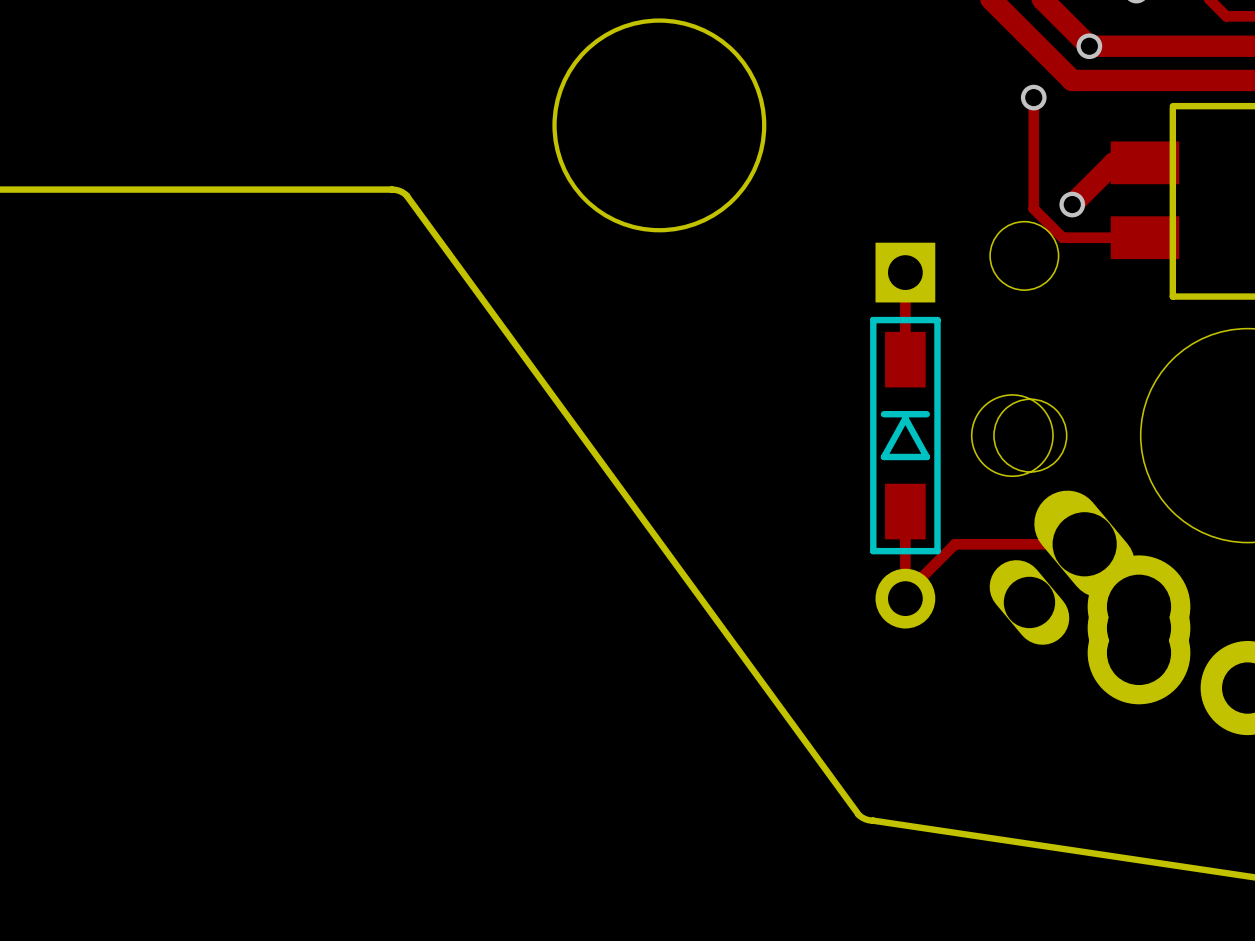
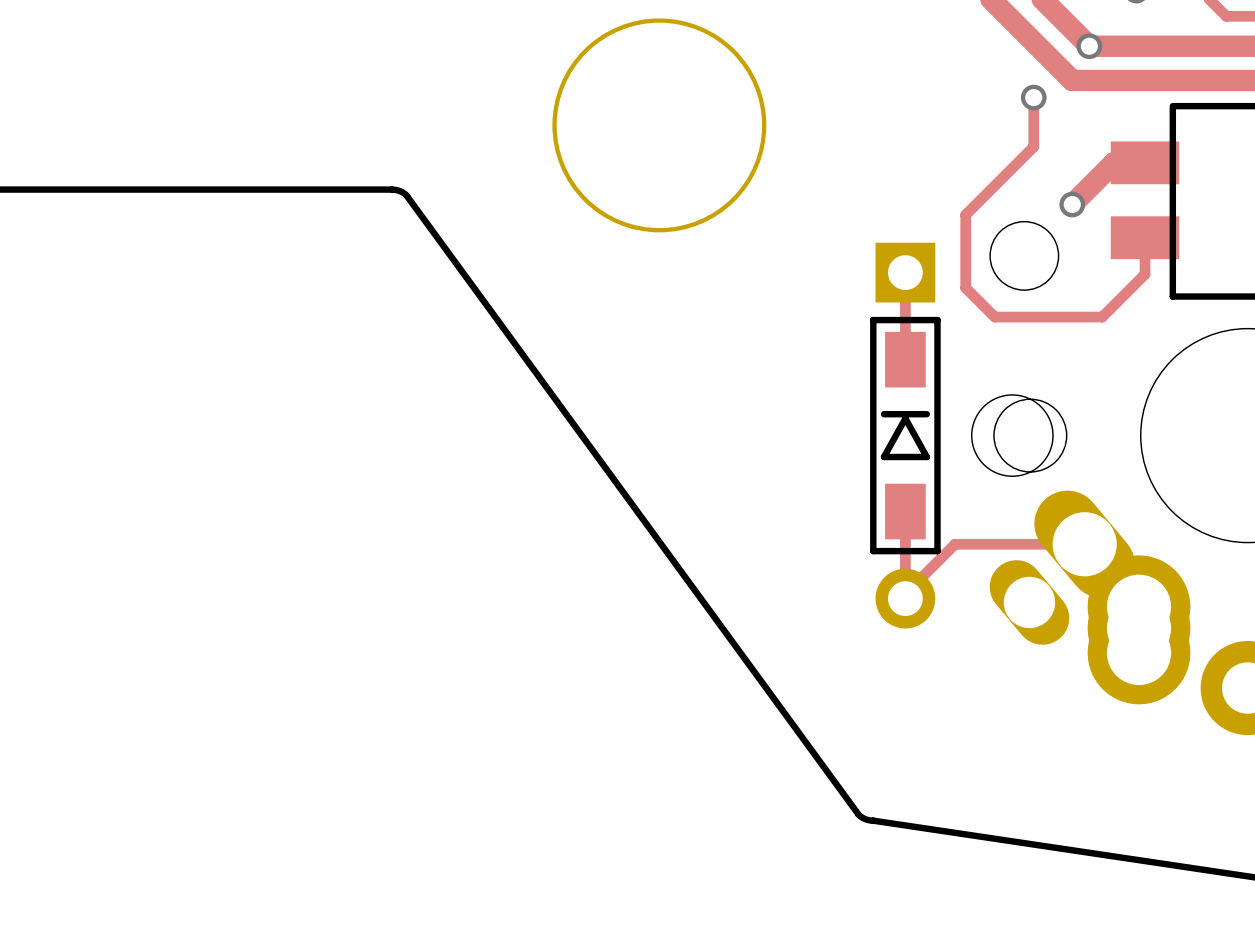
track: (1033, 146) (1033, 208) (1062, 237) (1145, 237) -> (1033, 146) (965, 214) (965, 287) (994, 317) (1102, 317) (1145, 274) (1145, 237)

